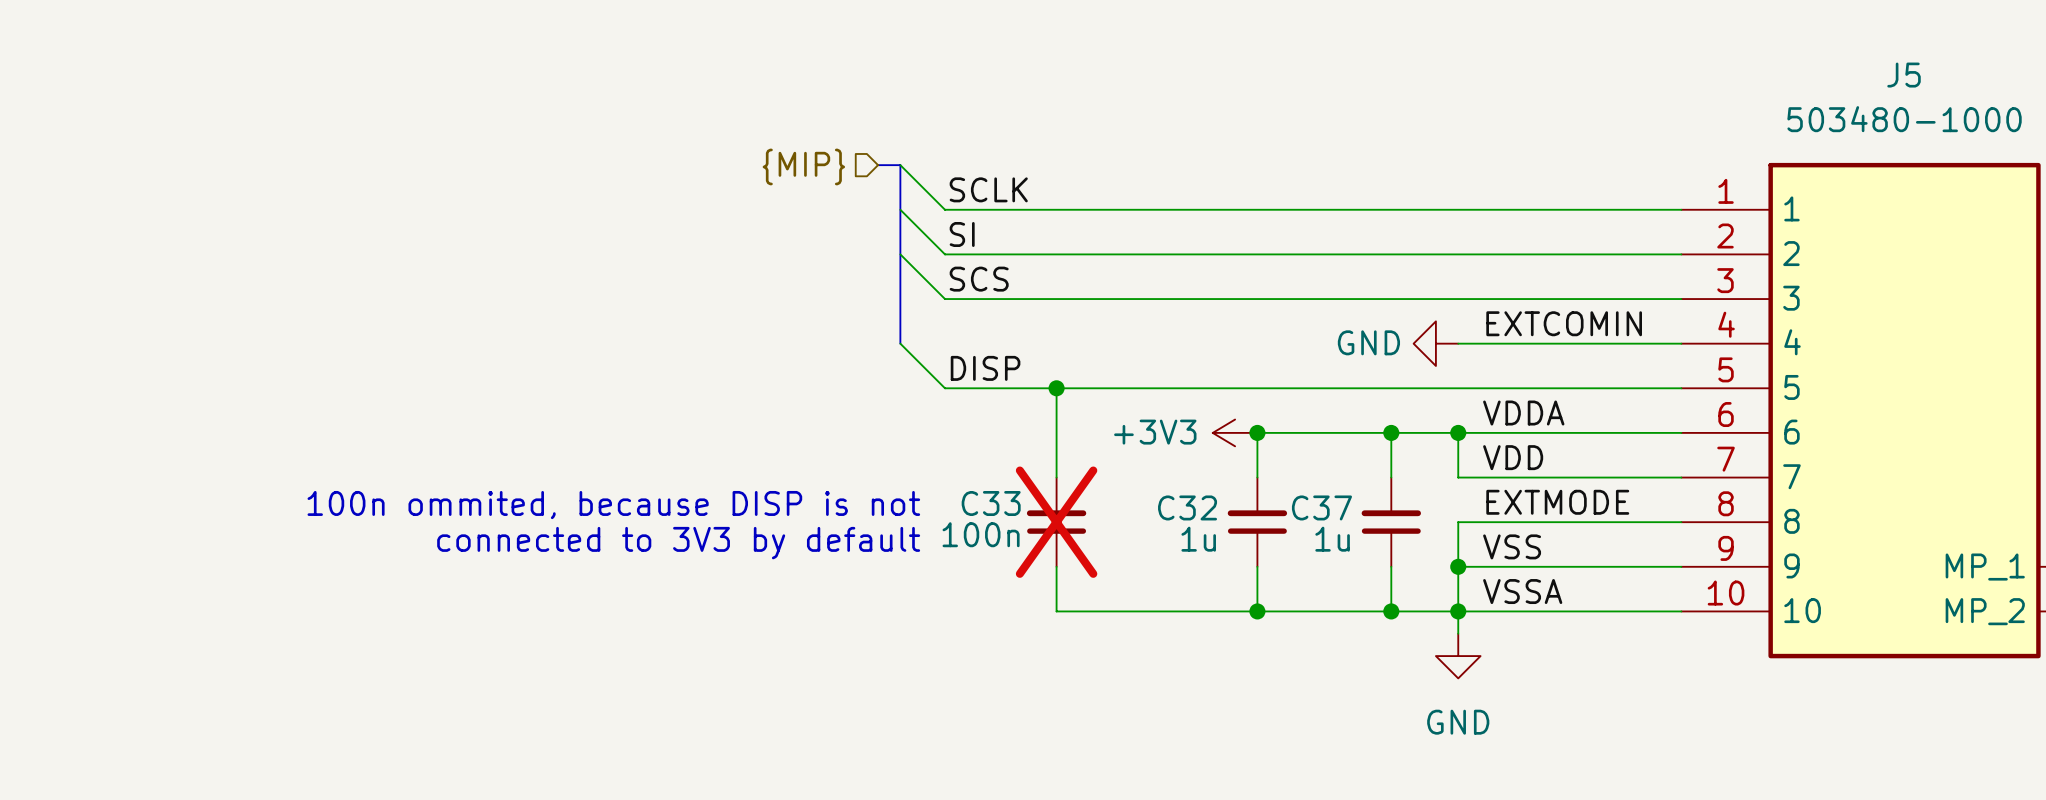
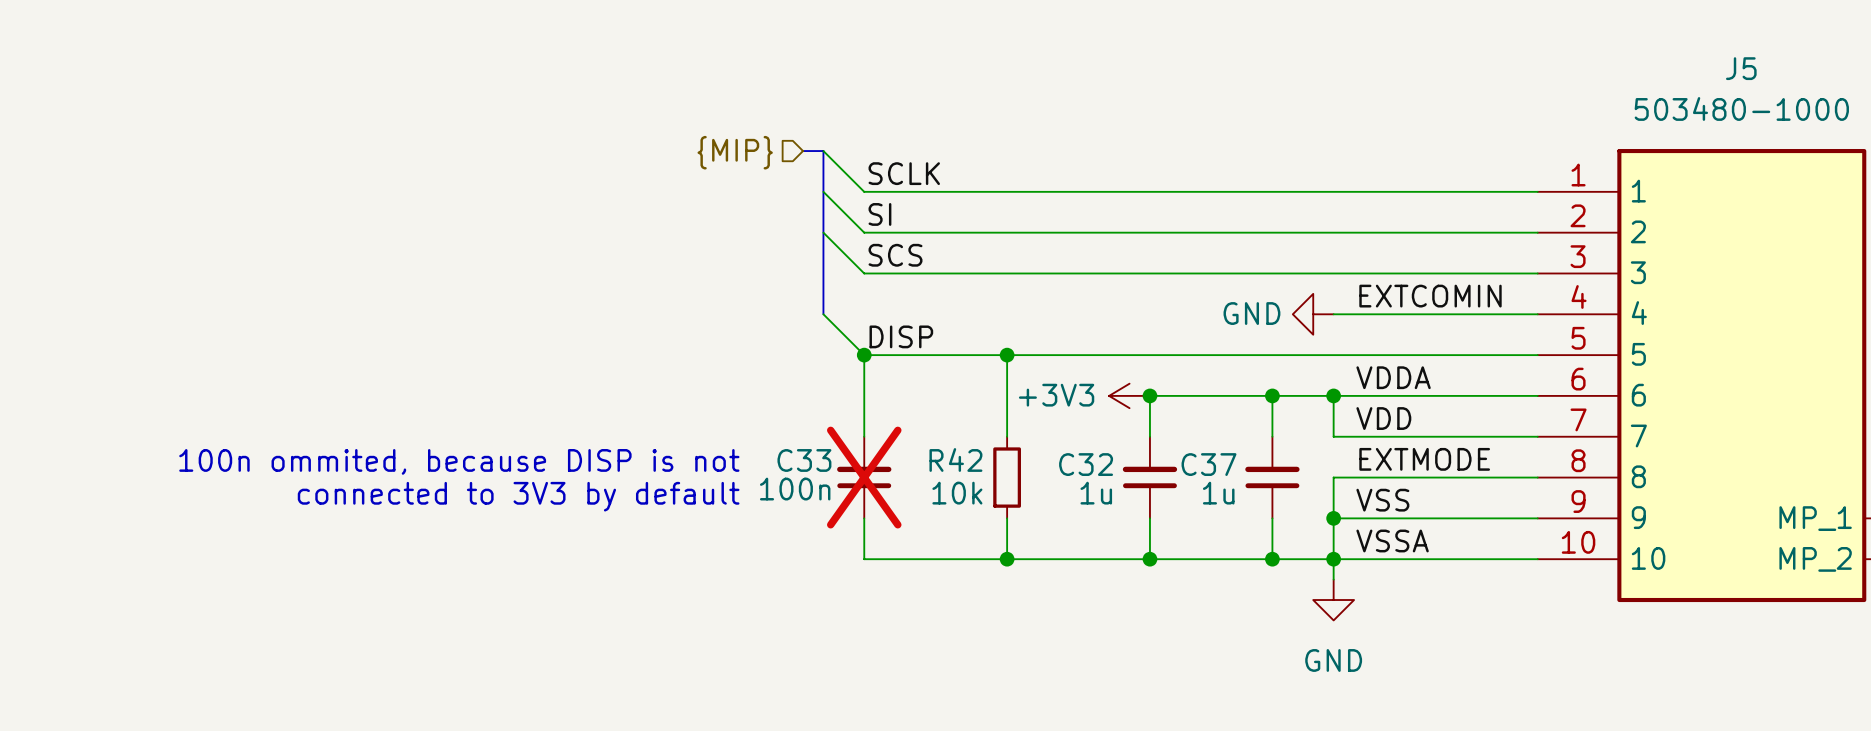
wire: none -> (864, 355) (864, 436)
junction: none -> (864, 355)
wire: (1056, 388) (1056, 477) -> (1007, 355) (1007, 436)
junction position: (1056, 388) -> (1007, 355)
text position: 100n ommited, because DISP is not (613, 505) -> 100n ommited, because DISP is not (459, 461)
C33 position: (1056, 522) -> (864, 477)
R42: none -> 10k (1007, 477)
text position: connected to 3V3 by default (678, 543) -> connected to 3V3 by default (518, 496)
wire: (1056, 566) (1056, 611) -> (864, 518) (864, 559) (966, 559)
wire: none -> (1007, 518) (1007, 559)
junction: none -> (1007, 559)

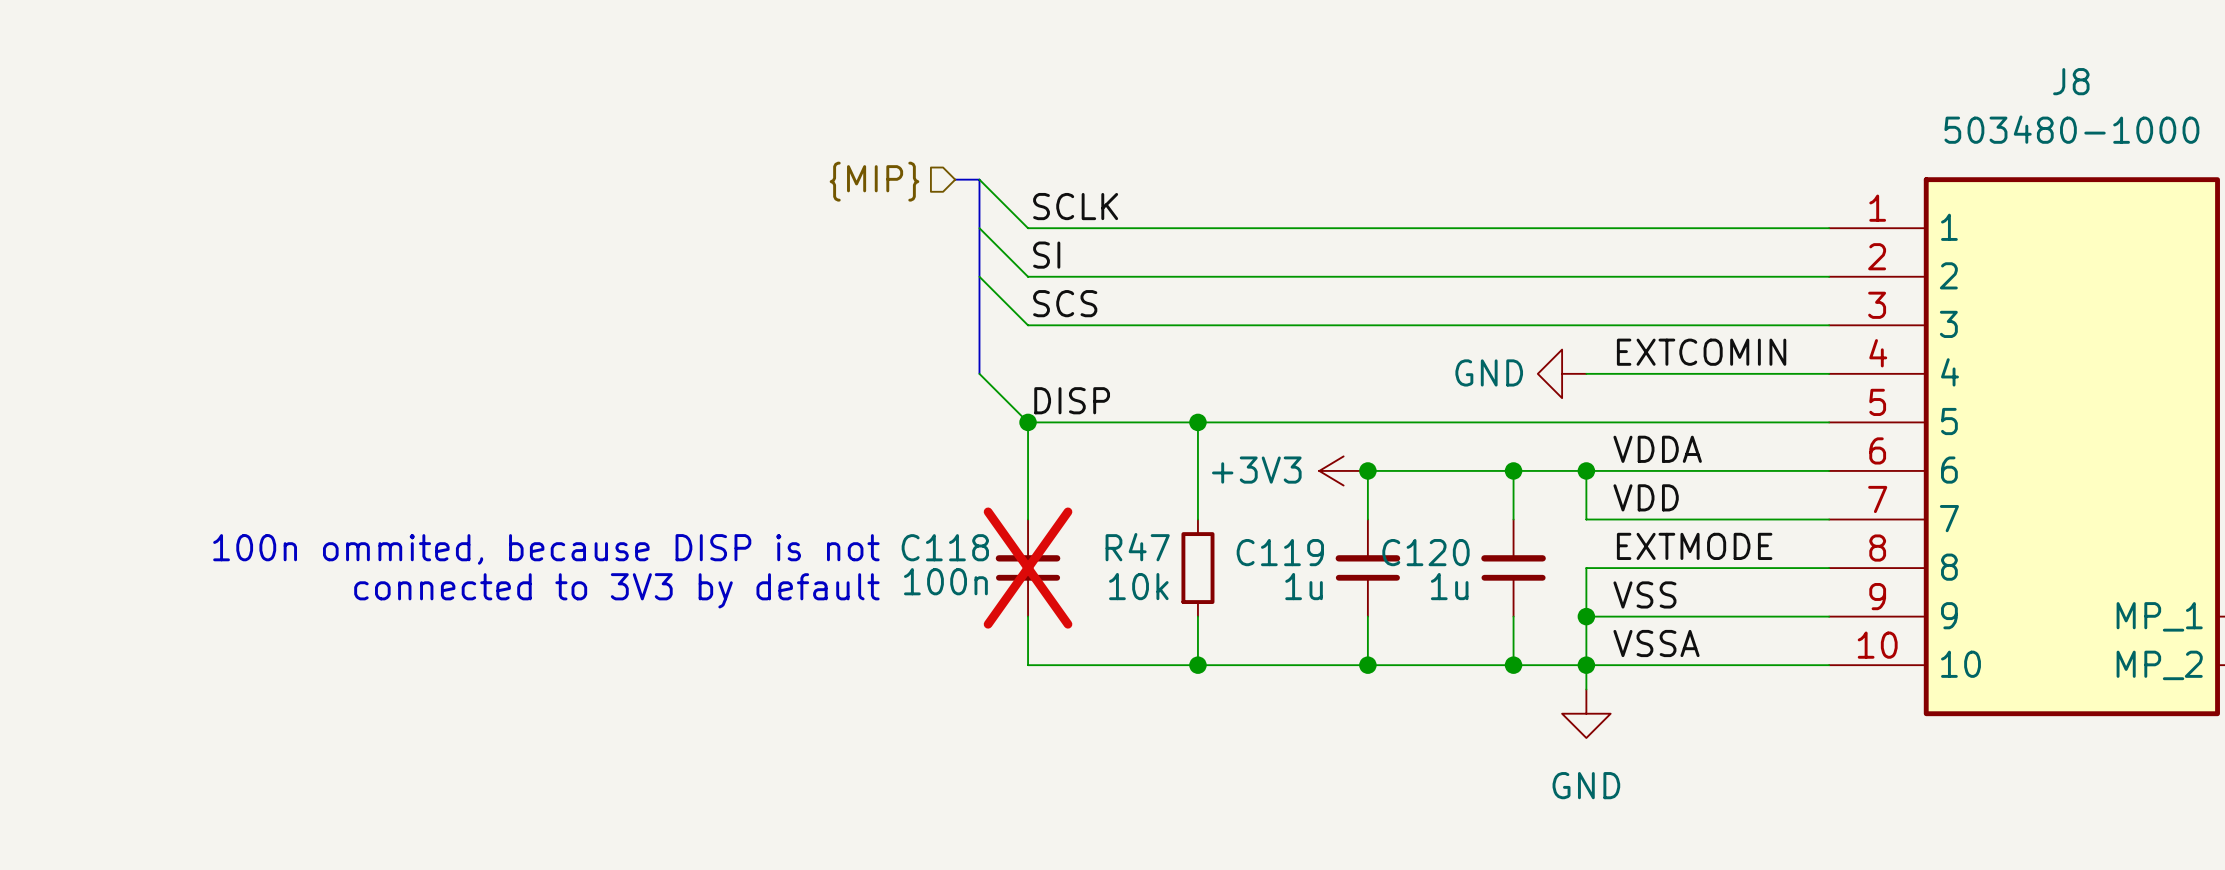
J5 name: J5 (1741, 68) -> J8 (2071, 81)
R42 name: R42 (955, 459) -> R47 (1137, 547)
C33 name: C33 (804, 460) -> C118 (945, 547)
C32 name: C32 (1086, 464) -> C119 (1280, 552)
C37 name: C37 (1209, 464) -> C120 (1425, 552)

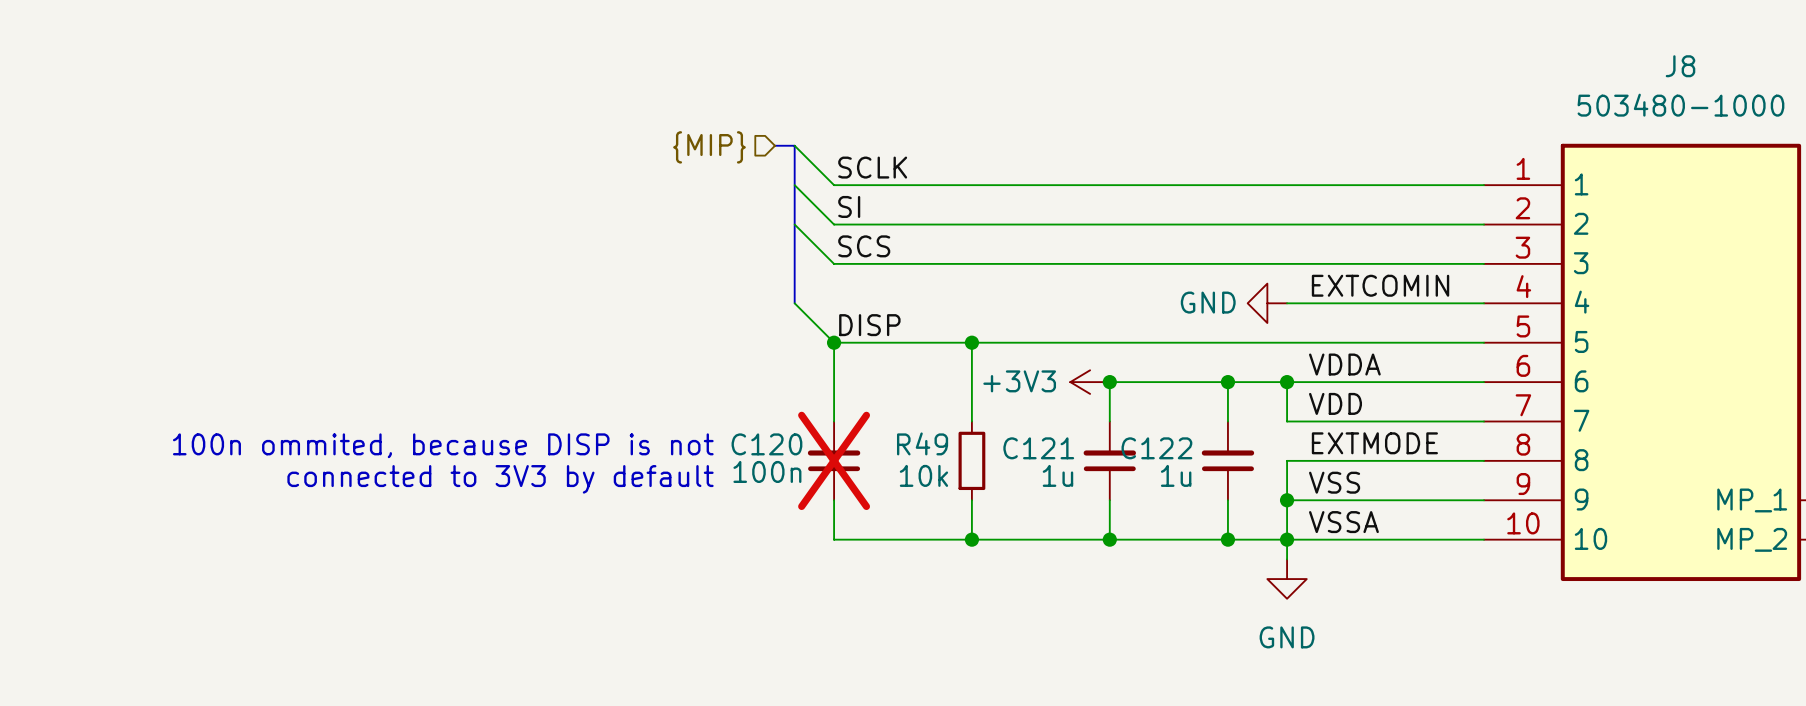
C118 name: C118 (945, 547) -> C120 (766, 444)
R47 name: R47 (1137, 547) -> R49 (922, 443)
C119 name: C119 (1280, 552) -> C121 (1038, 448)
C120 name: C120 (1425, 552) -> C122 (1156, 448)

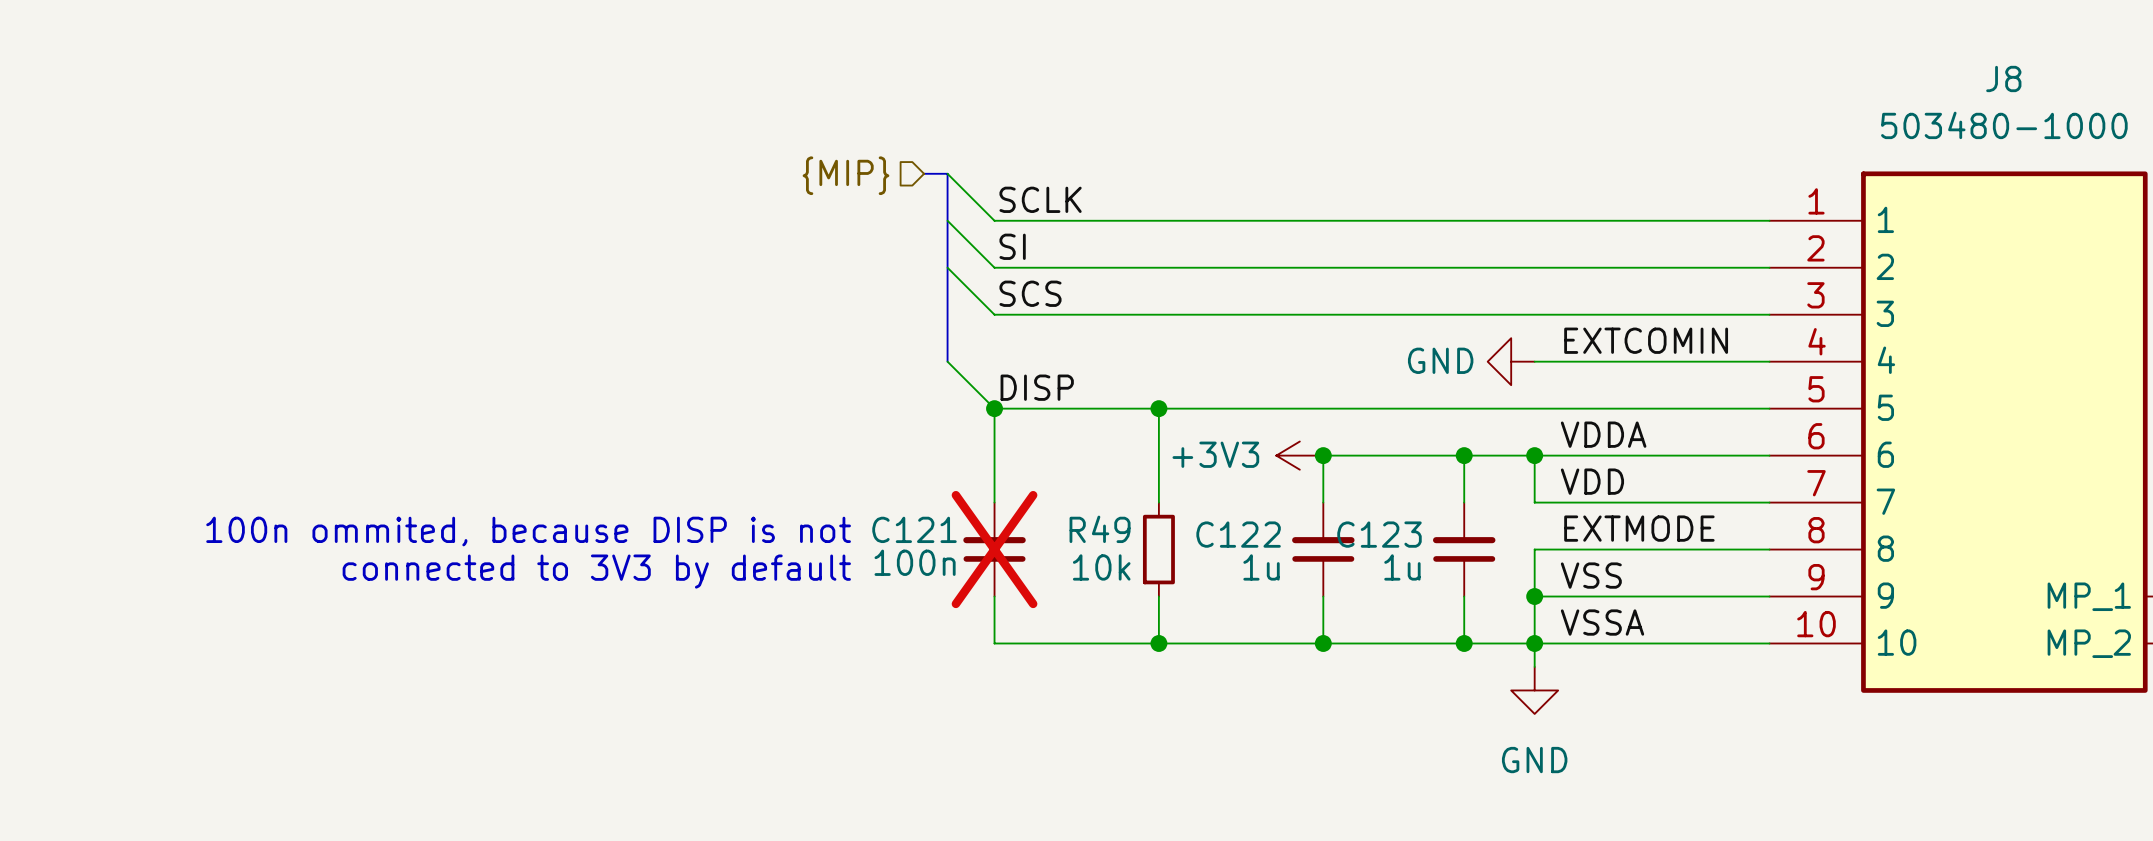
C120 name: C120 (766, 444) -> C121 (914, 529)
C121 name: C121 (1038, 448) -> C122 (1238, 534)
C122 name: C122 (1156, 448) -> C123 (1379, 534)

